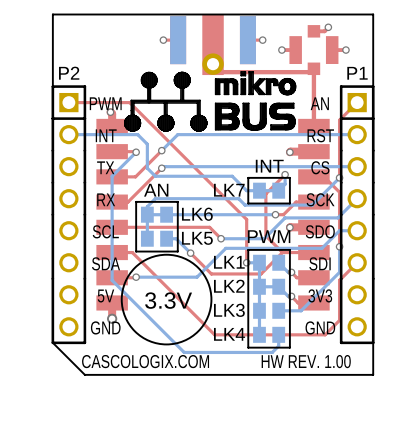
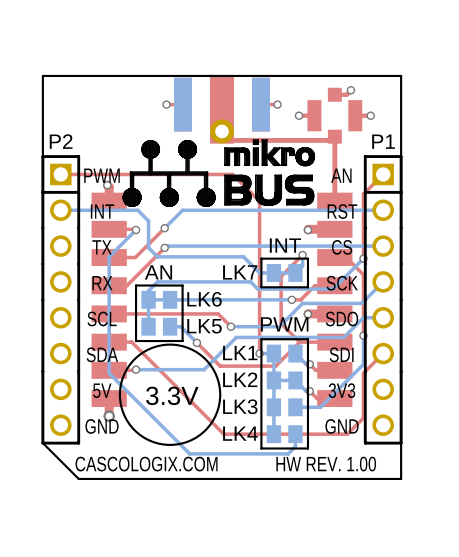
top track: (129, 102) (246, 219) -> (128, 174) (232, 174) (259, 201) (259, 305)

